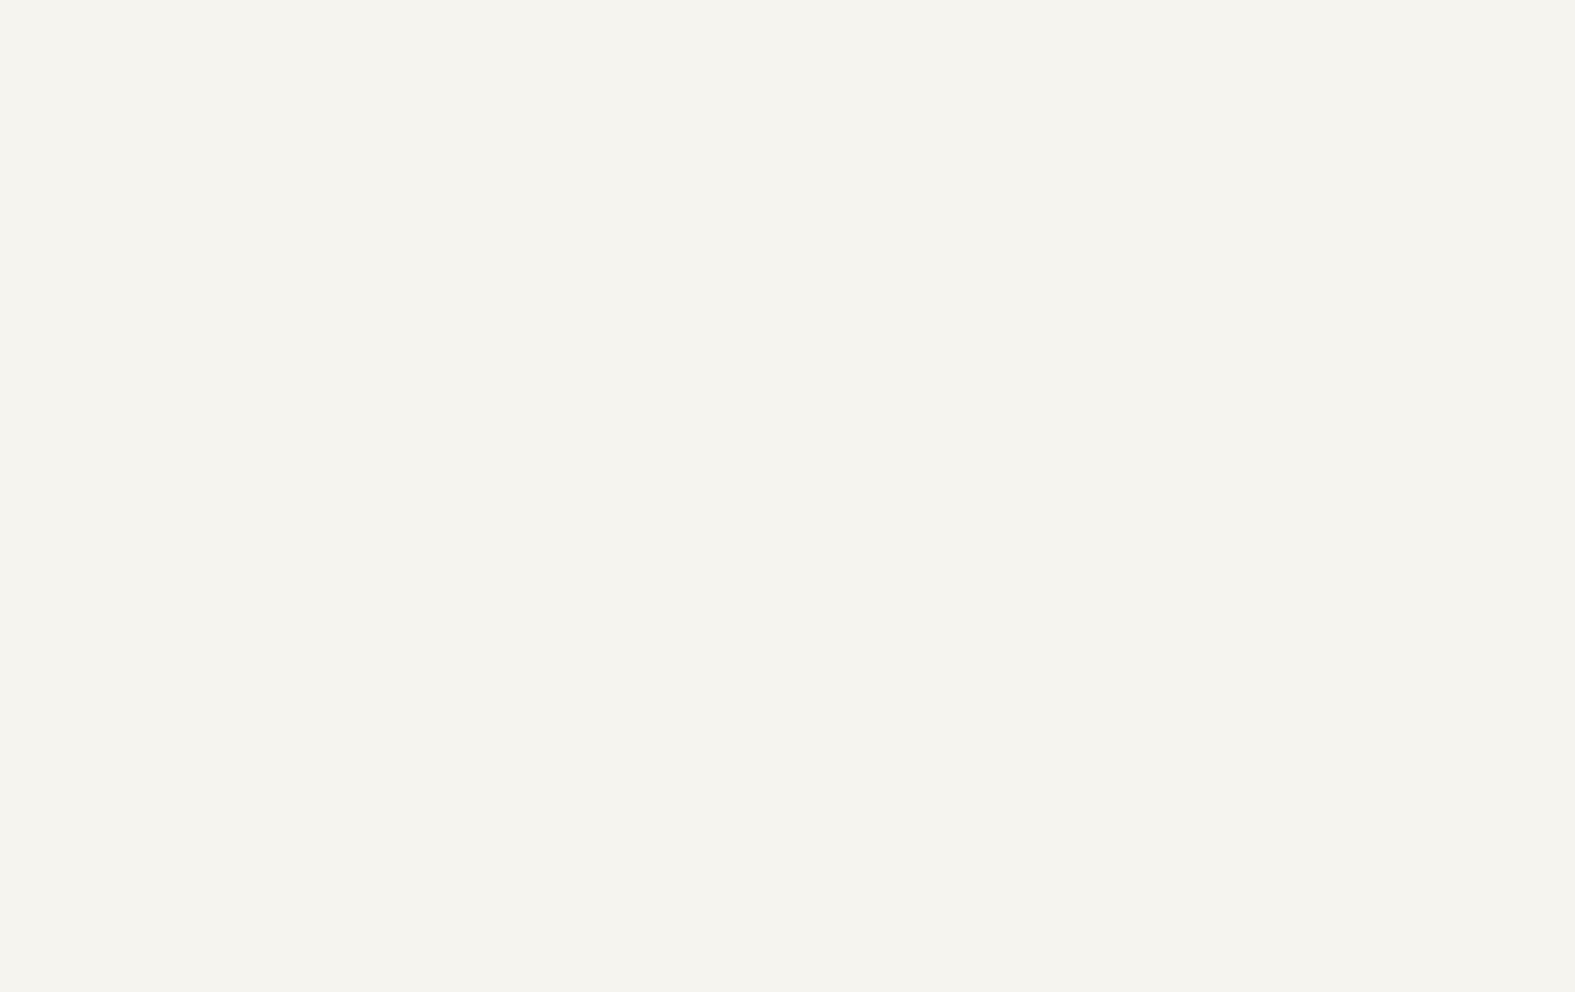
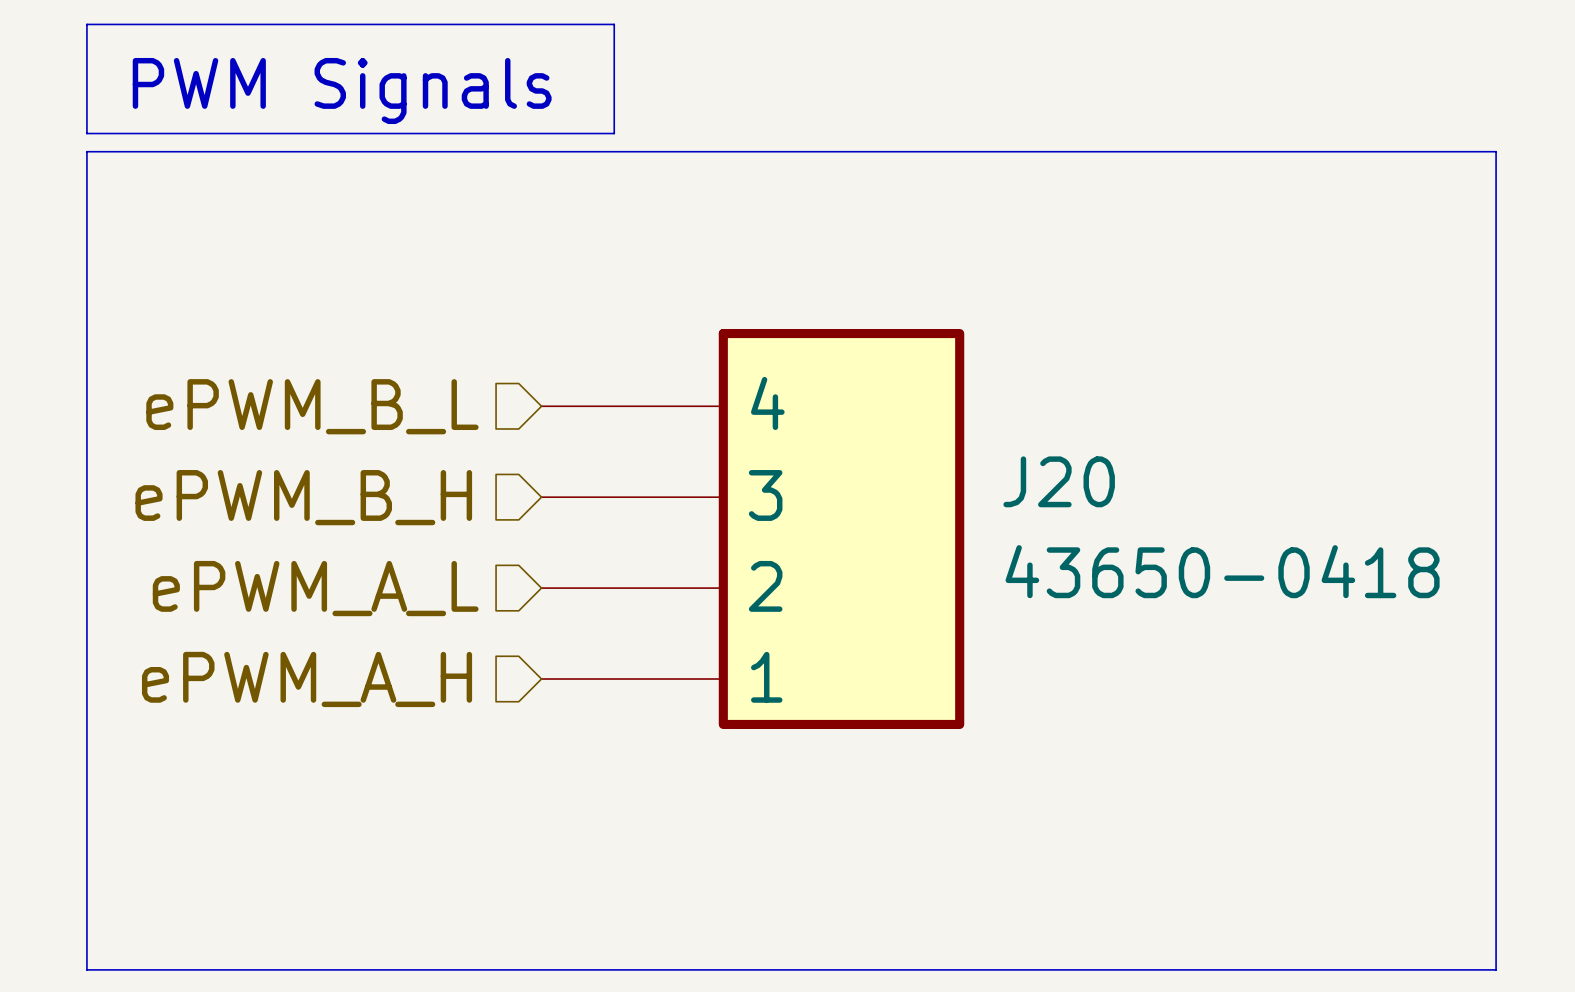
line: none -> (86, 24) (86, 133) (614, 133) (614, 24) (86, 24)
text: none -> PWM Signals (342, 91)
line: none -> (86, 151) (1496, 151) (1496, 969) (86, 969) (86, 151)
hierarchical label: none -> ePWM_B_L (312, 406)
hierarchical label: none -> ePWM_B_H (303, 497)
J20: none -> 43650-0418 (752, 528)
hierarchical label: none -> ePWM_A_L (315, 588)
hierarchical label: none -> ePWM_A_H (307, 679)

